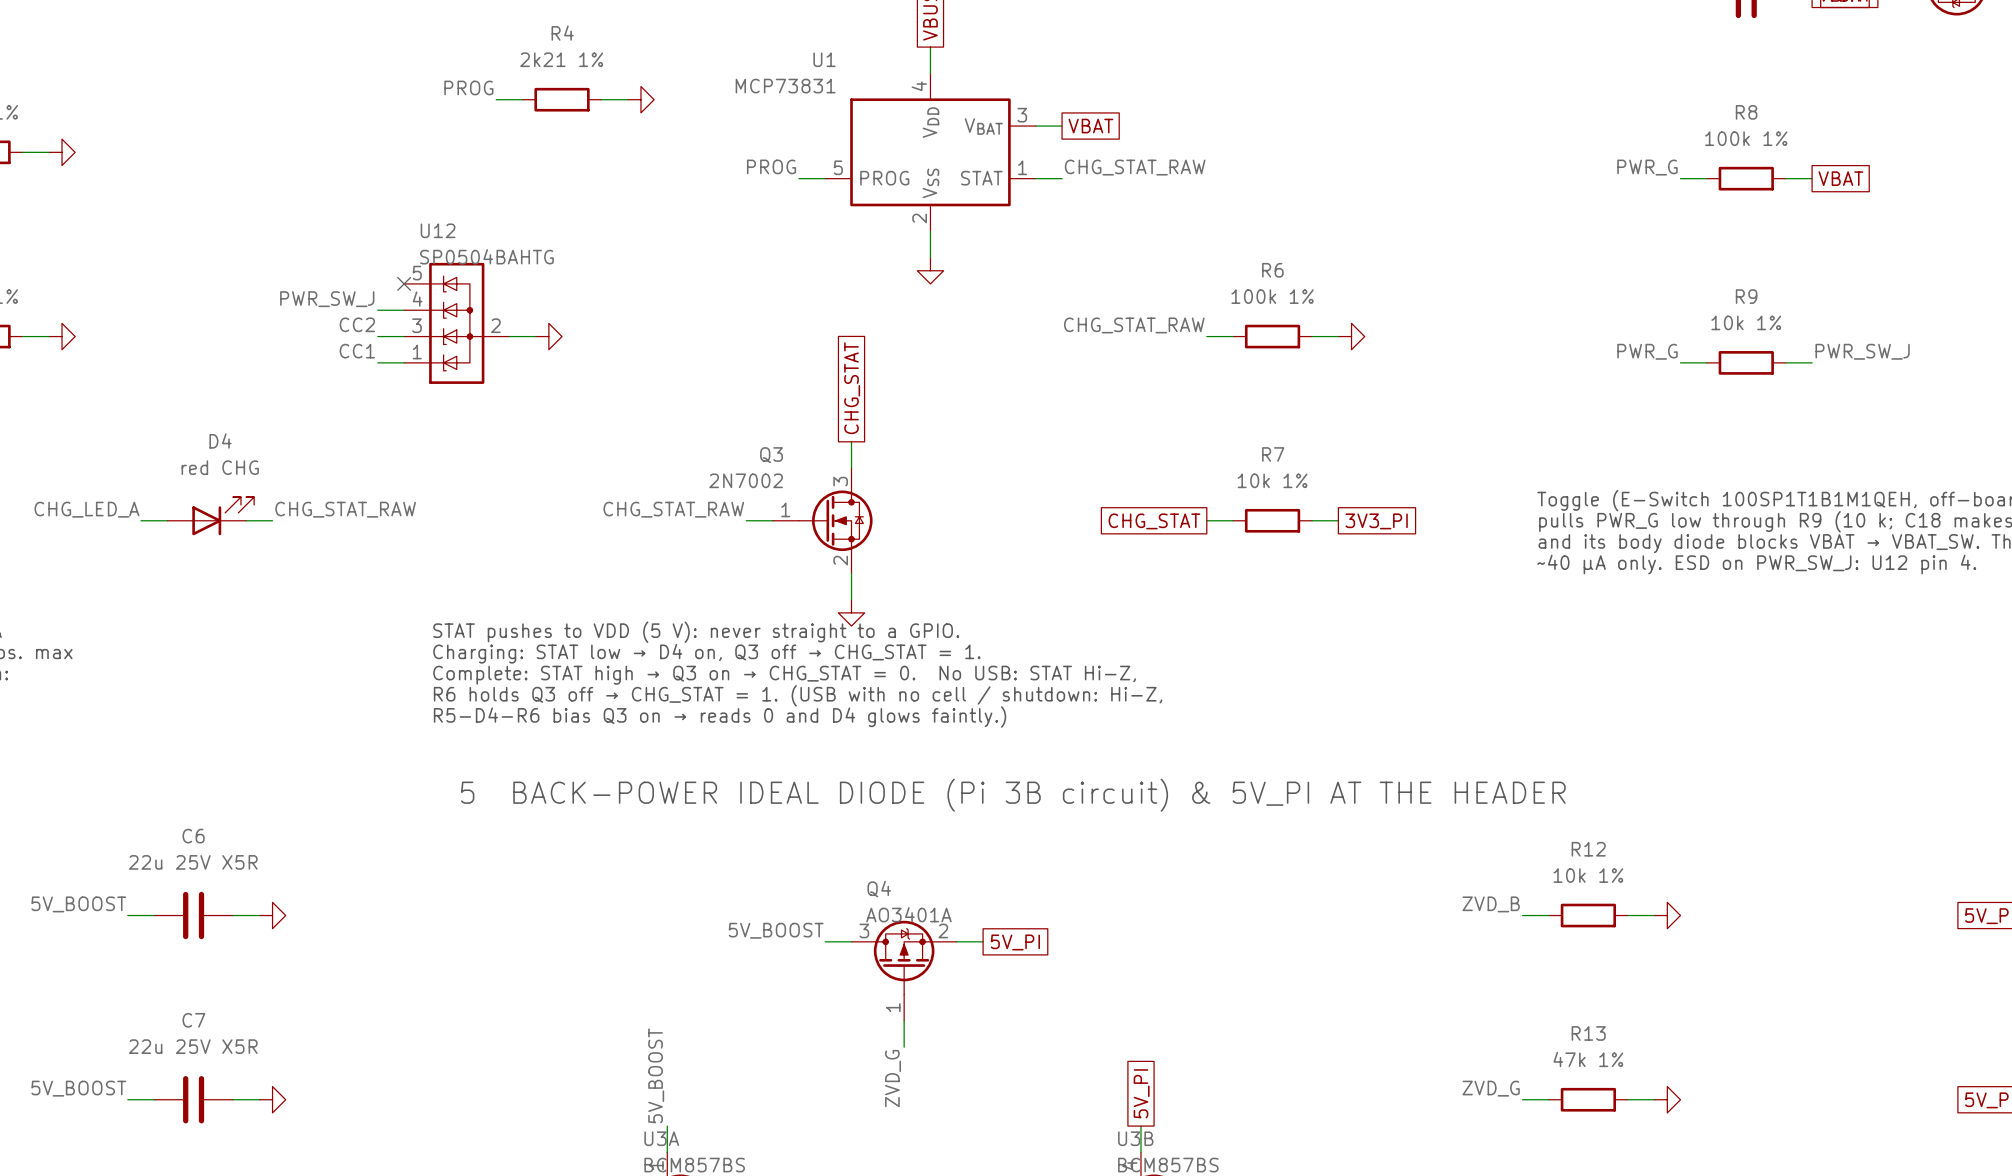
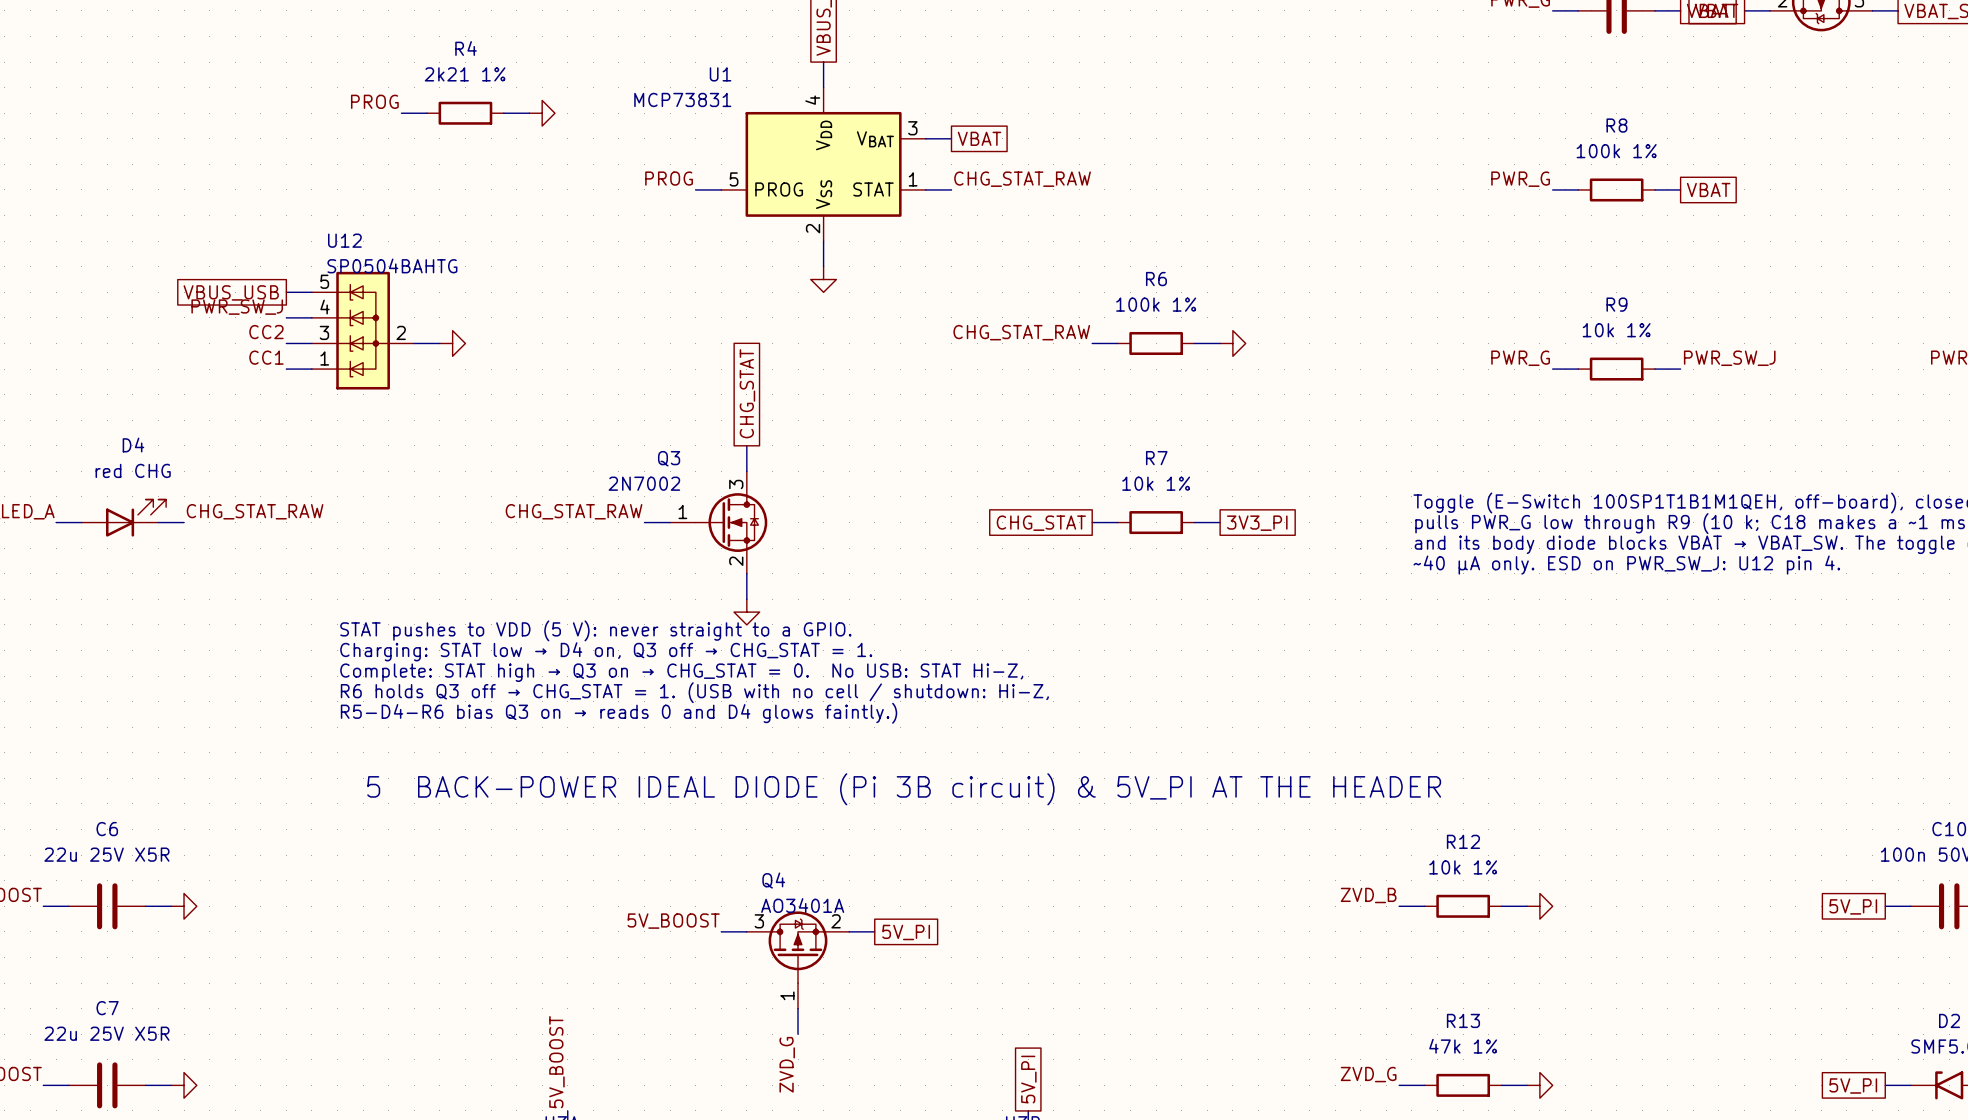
wire: none -> (286, 292) (311, 292)
no-connect mark: (404, 283) -> none
global label: none -> VBUS_USB (231, 292)

